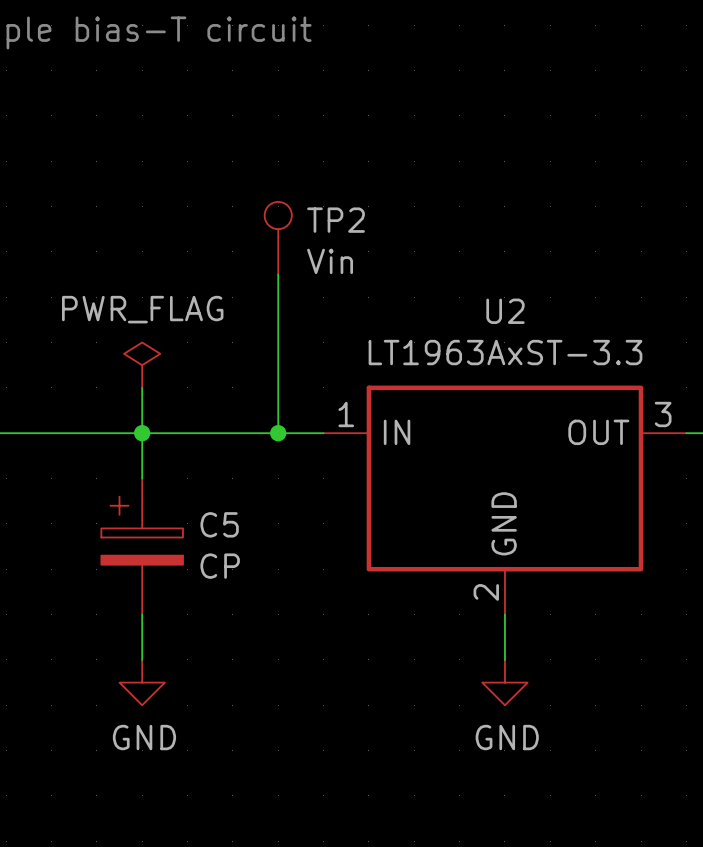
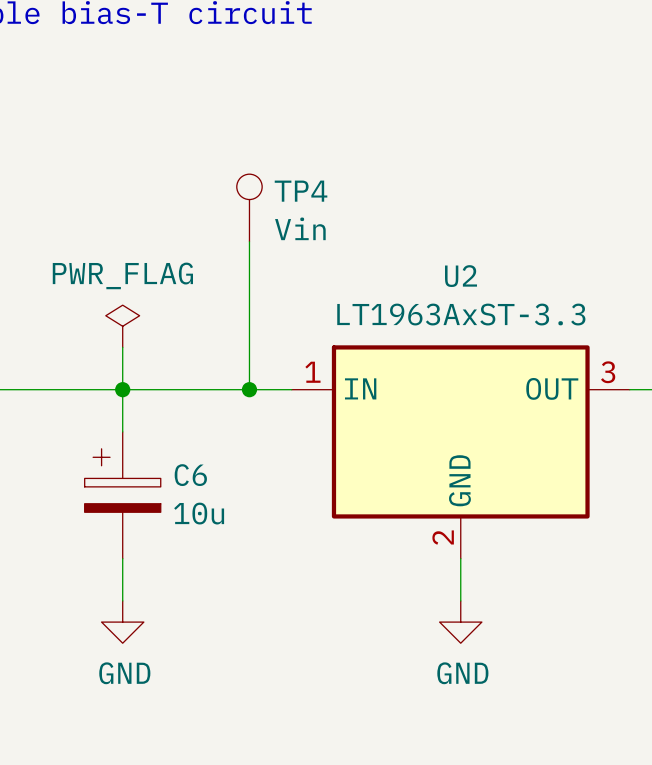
TP2 name: TP2 (336, 220) -> TP4 (301, 191)
C5 name: C5 (219, 524) -> C6 (190, 475)
C5 value: CP (220, 566) -> 10u (199, 513)

